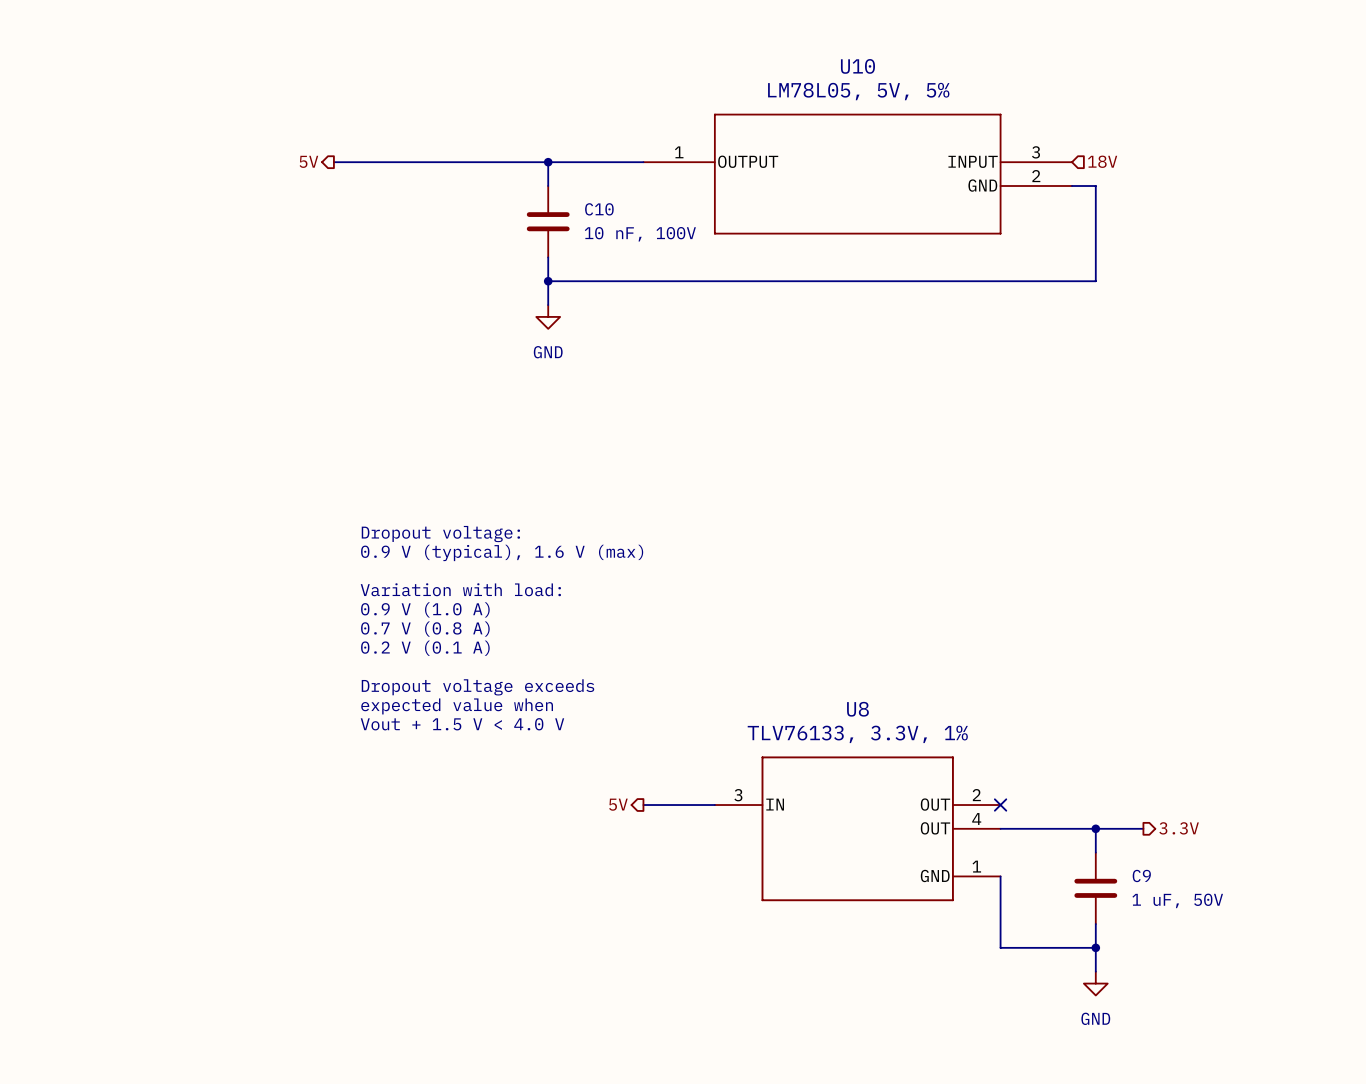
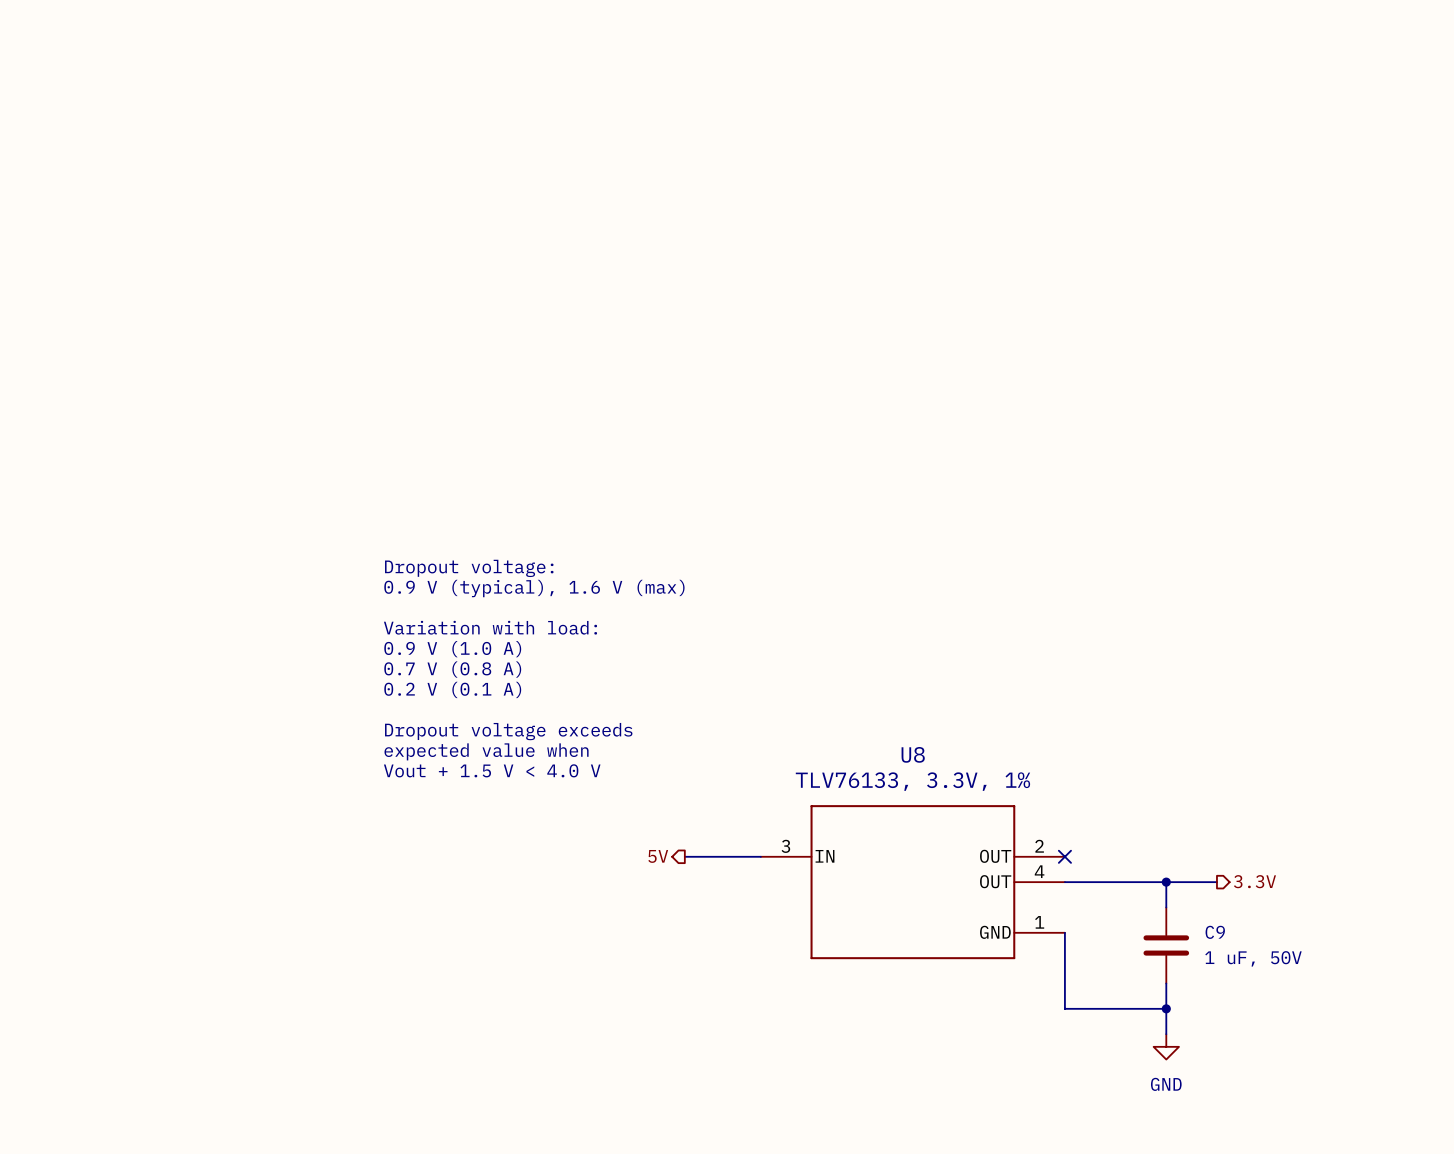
hierarchical label: 5V (308, 161) -> none
hierarchical label: 18V (1102, 161) -> none
wire: (333, 162) (643, 162) -> none
wire: (548, 162) (548, 186) -> none
junction: (548, 162) -> none
U10: LM78L05, 5V, 5% (857, 174) -> none
wire: (1071, 186) (1095, 186) (1095, 281) (548, 281) -> none
C10: 10 nF, 100V (548, 221) -> none
wire: (548, 257) (548, 305) -> none
junction: (548, 281) -> none
power symbol: GND (548, 316) -> none

